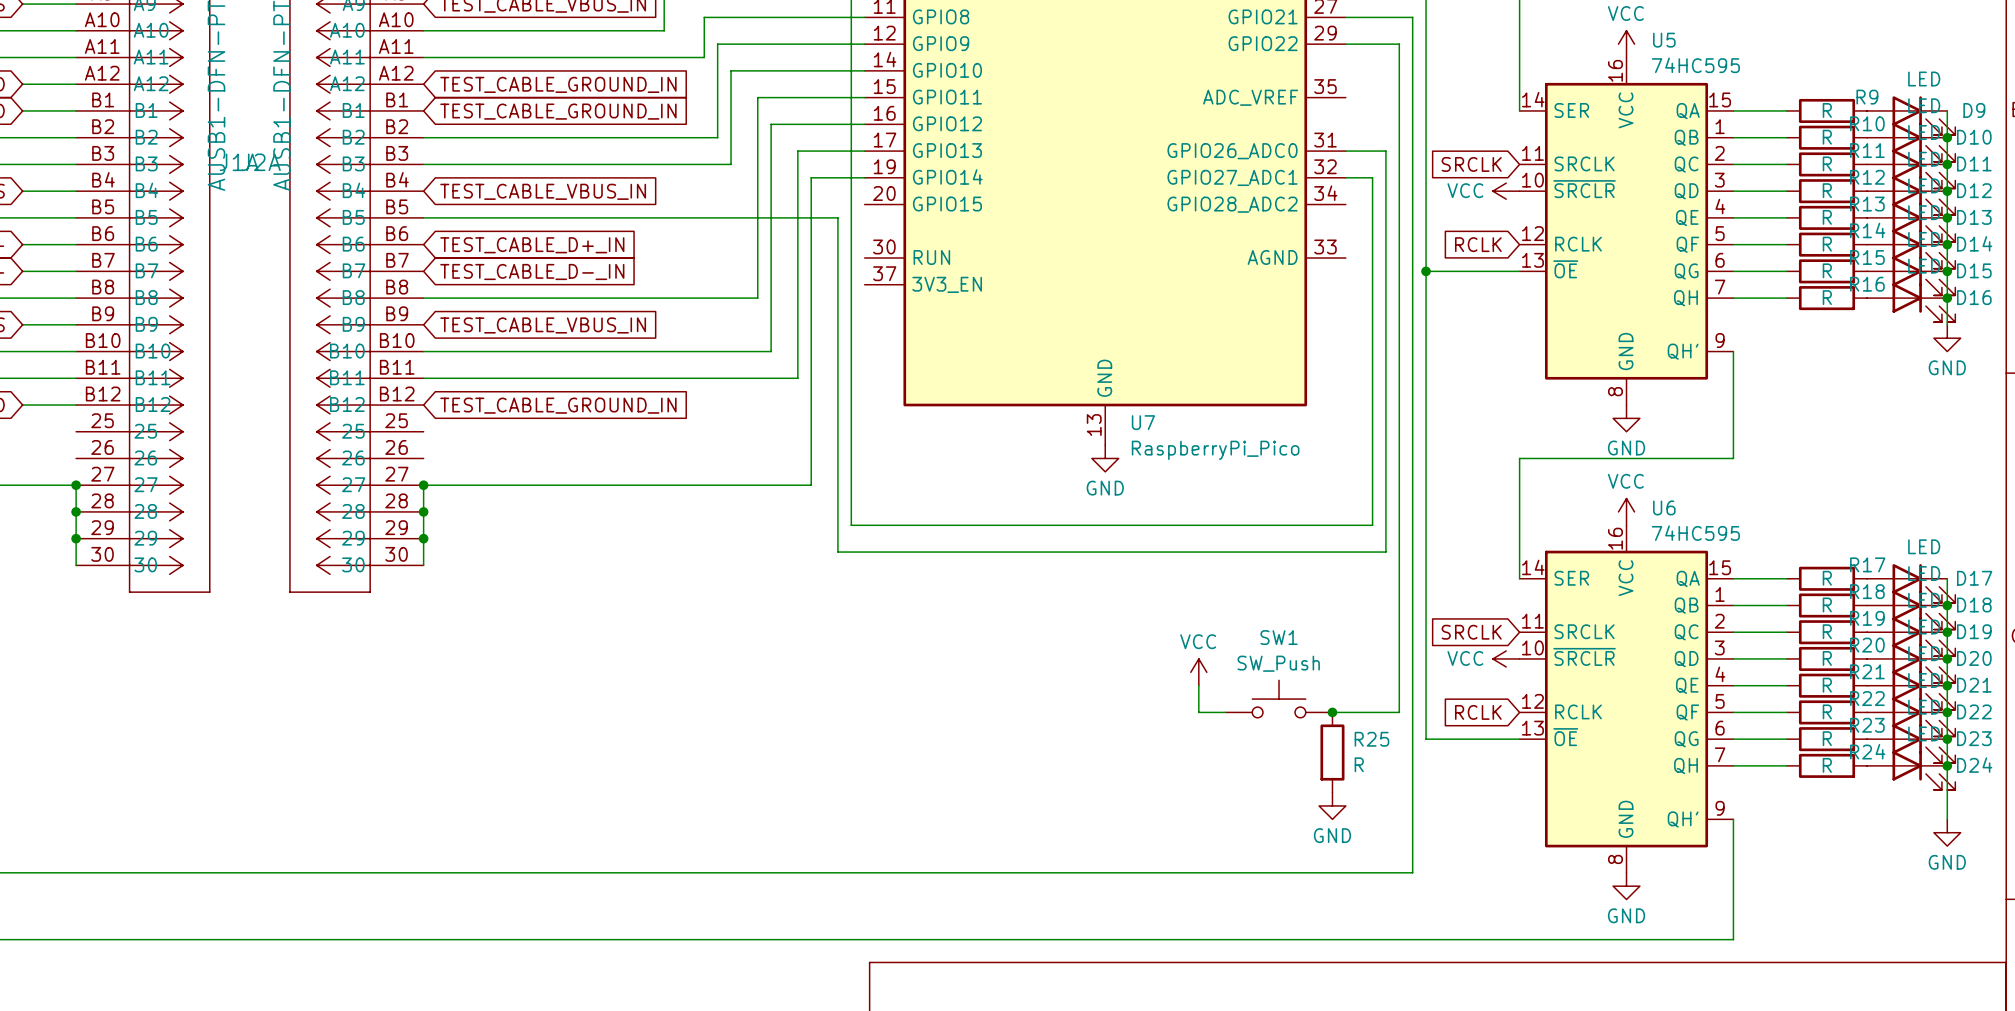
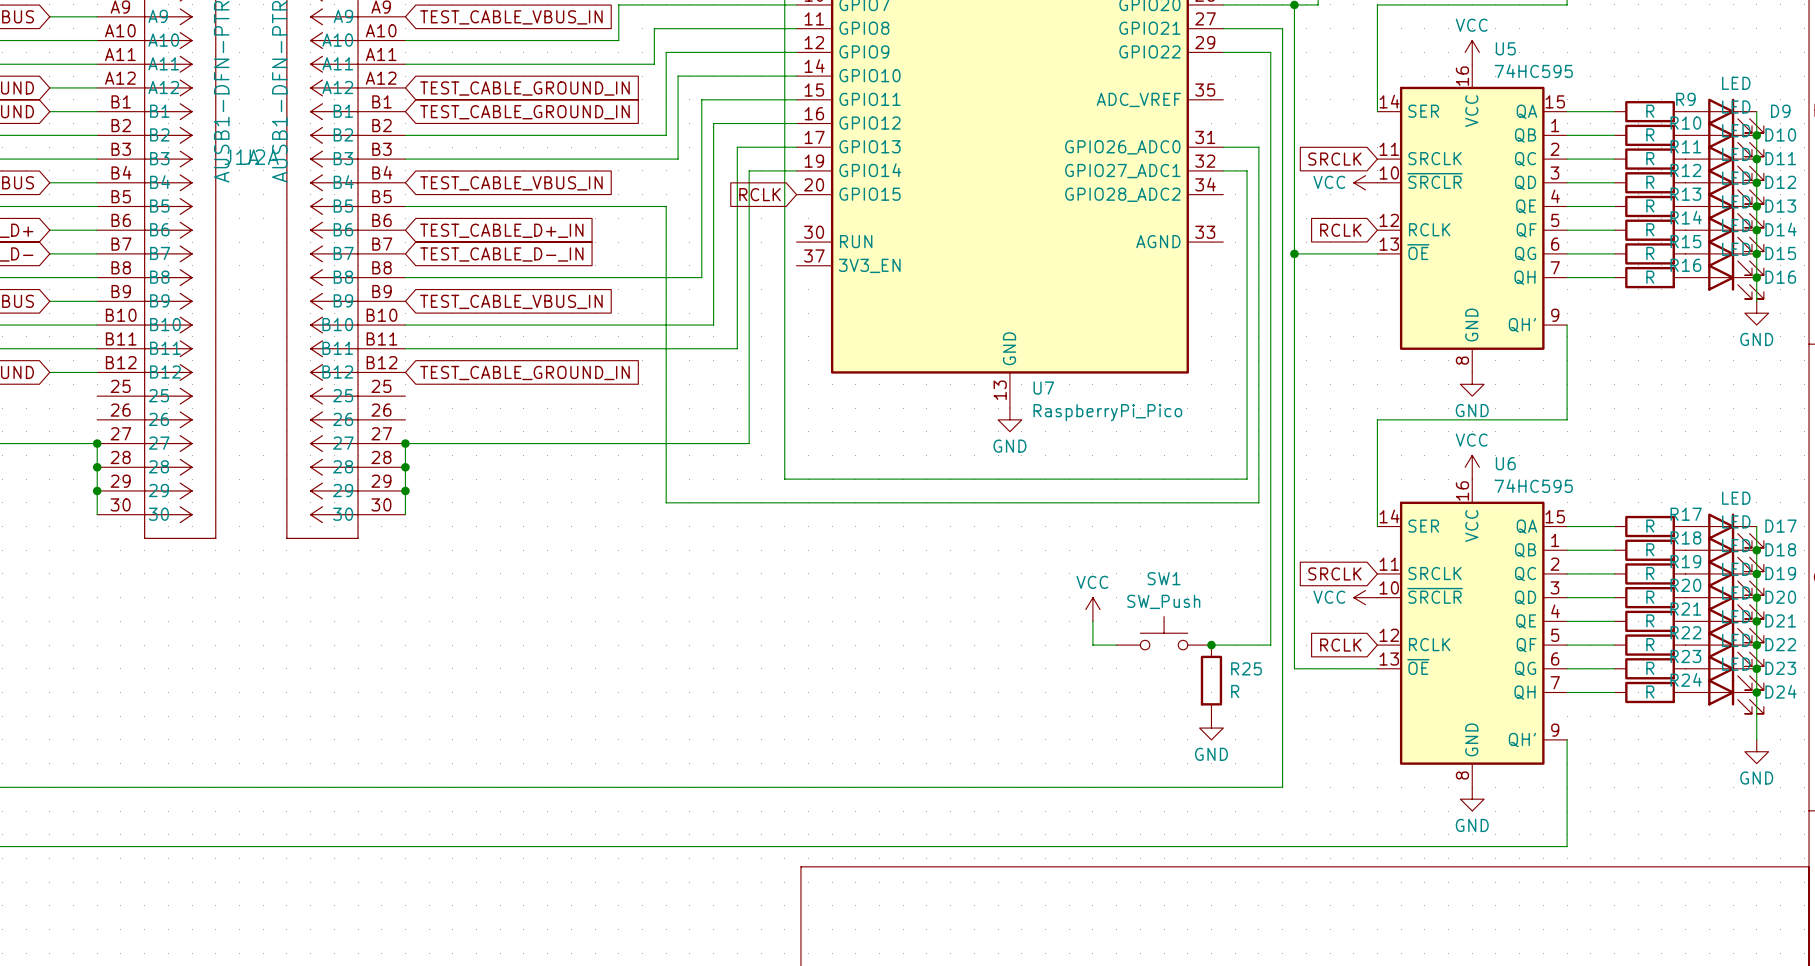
global label: none -> RCLK (760, 194)
wire: (717, 217) (837, 217) (837, 552) -> (666, 206) (666, 502) (772, 502)

